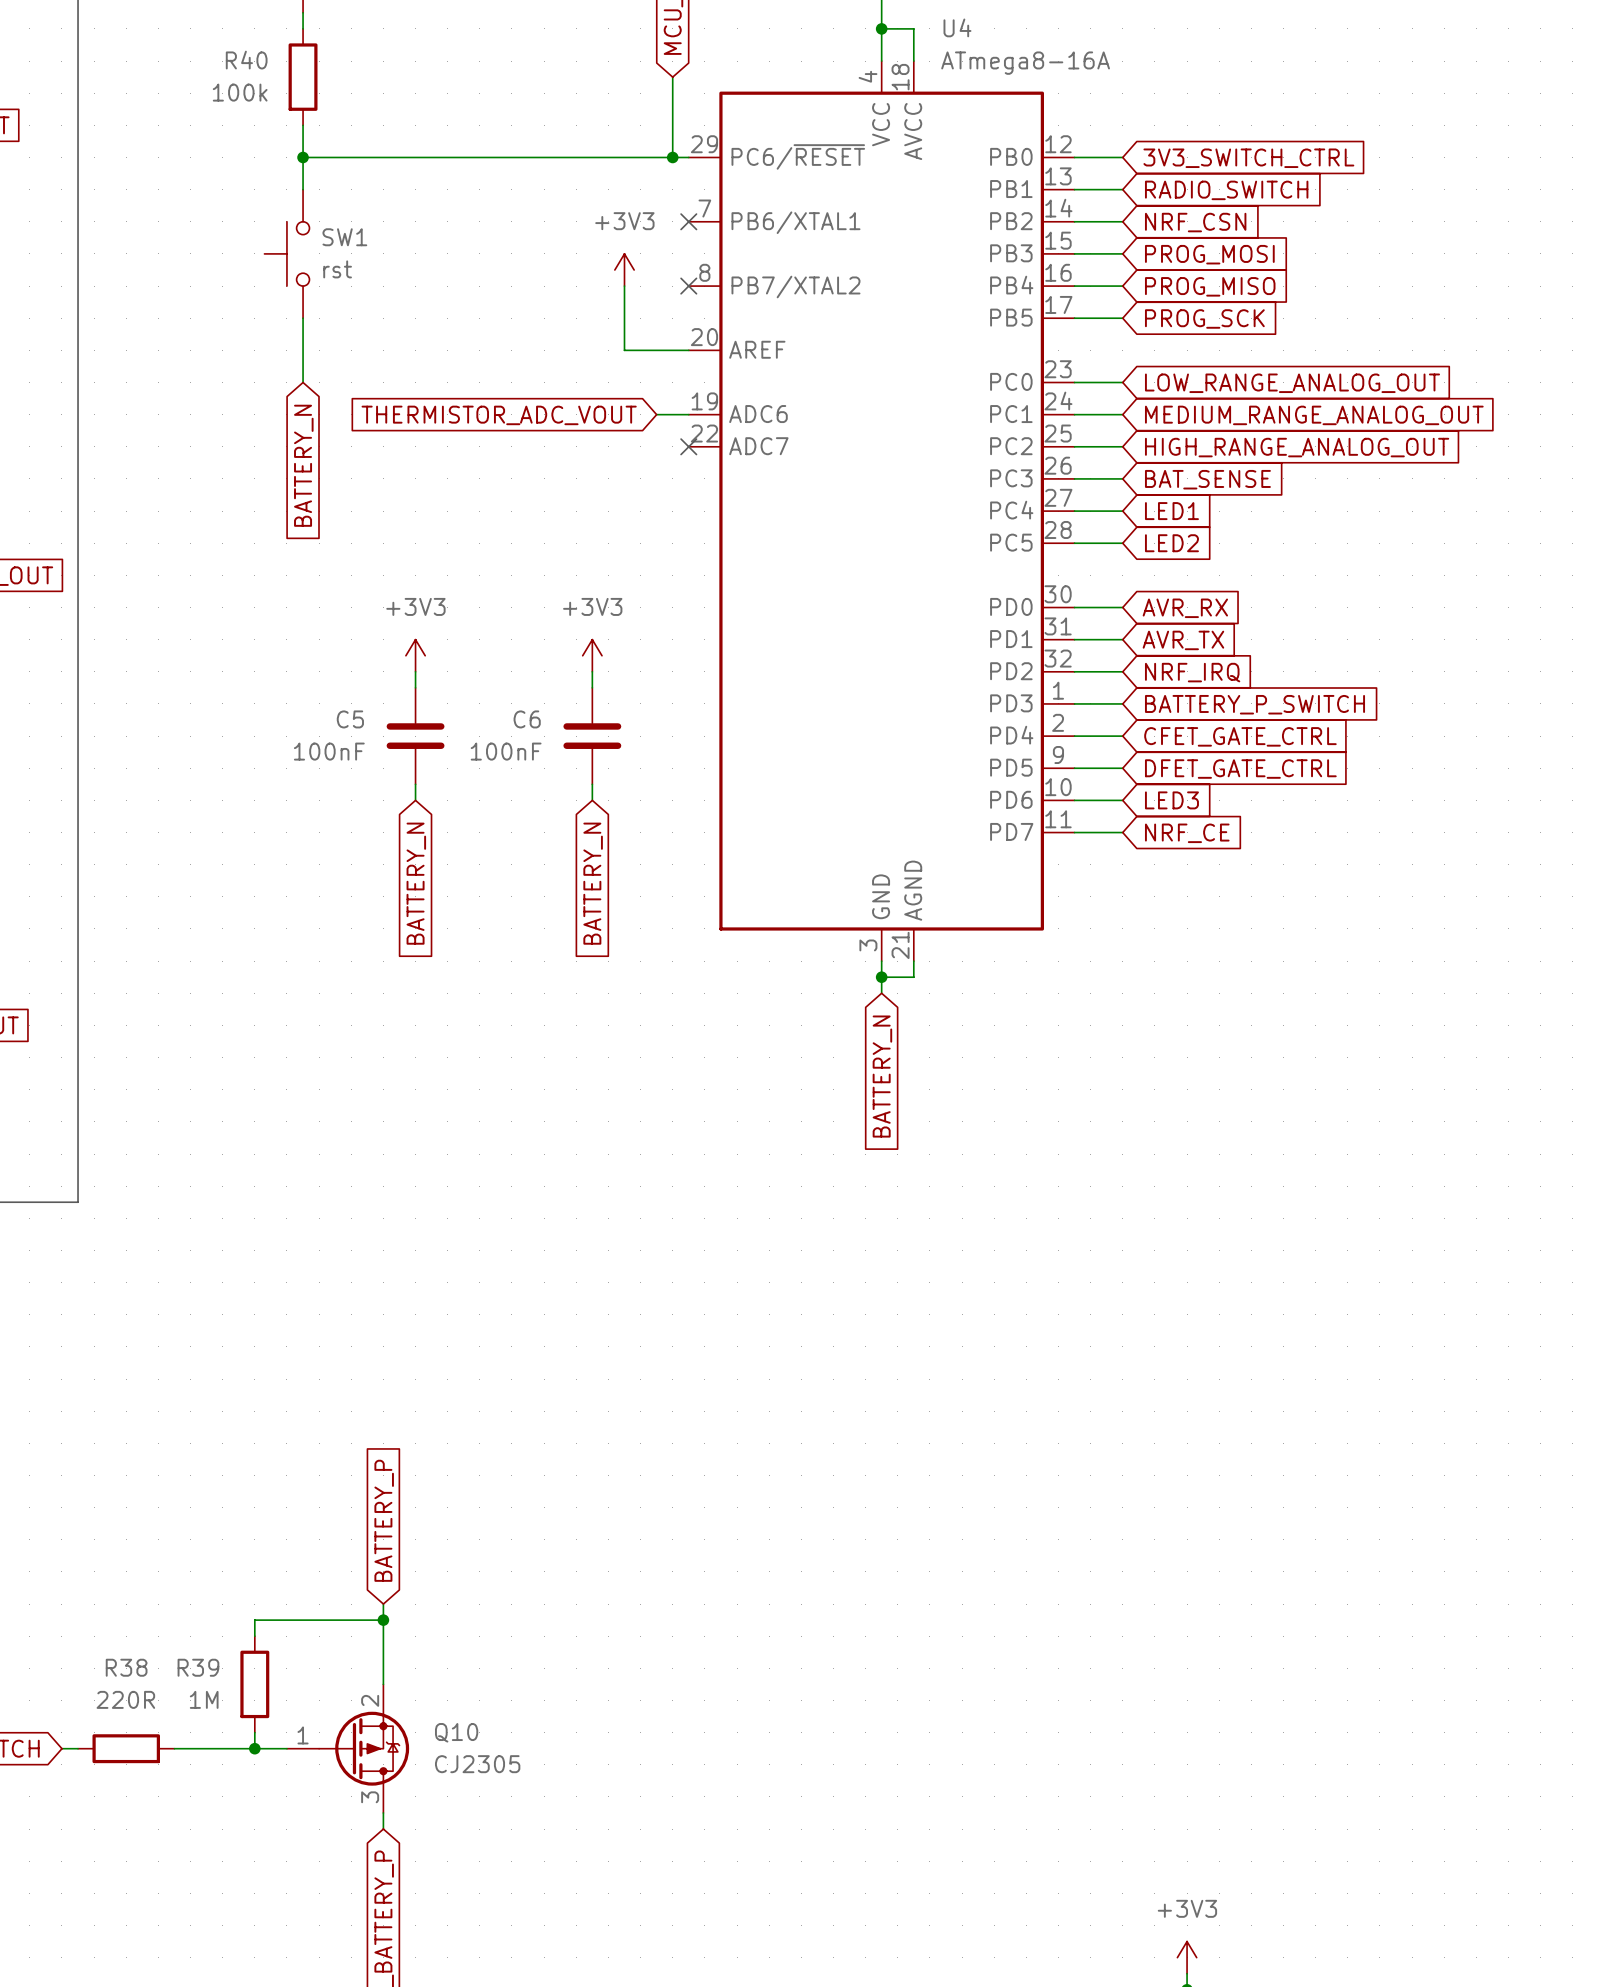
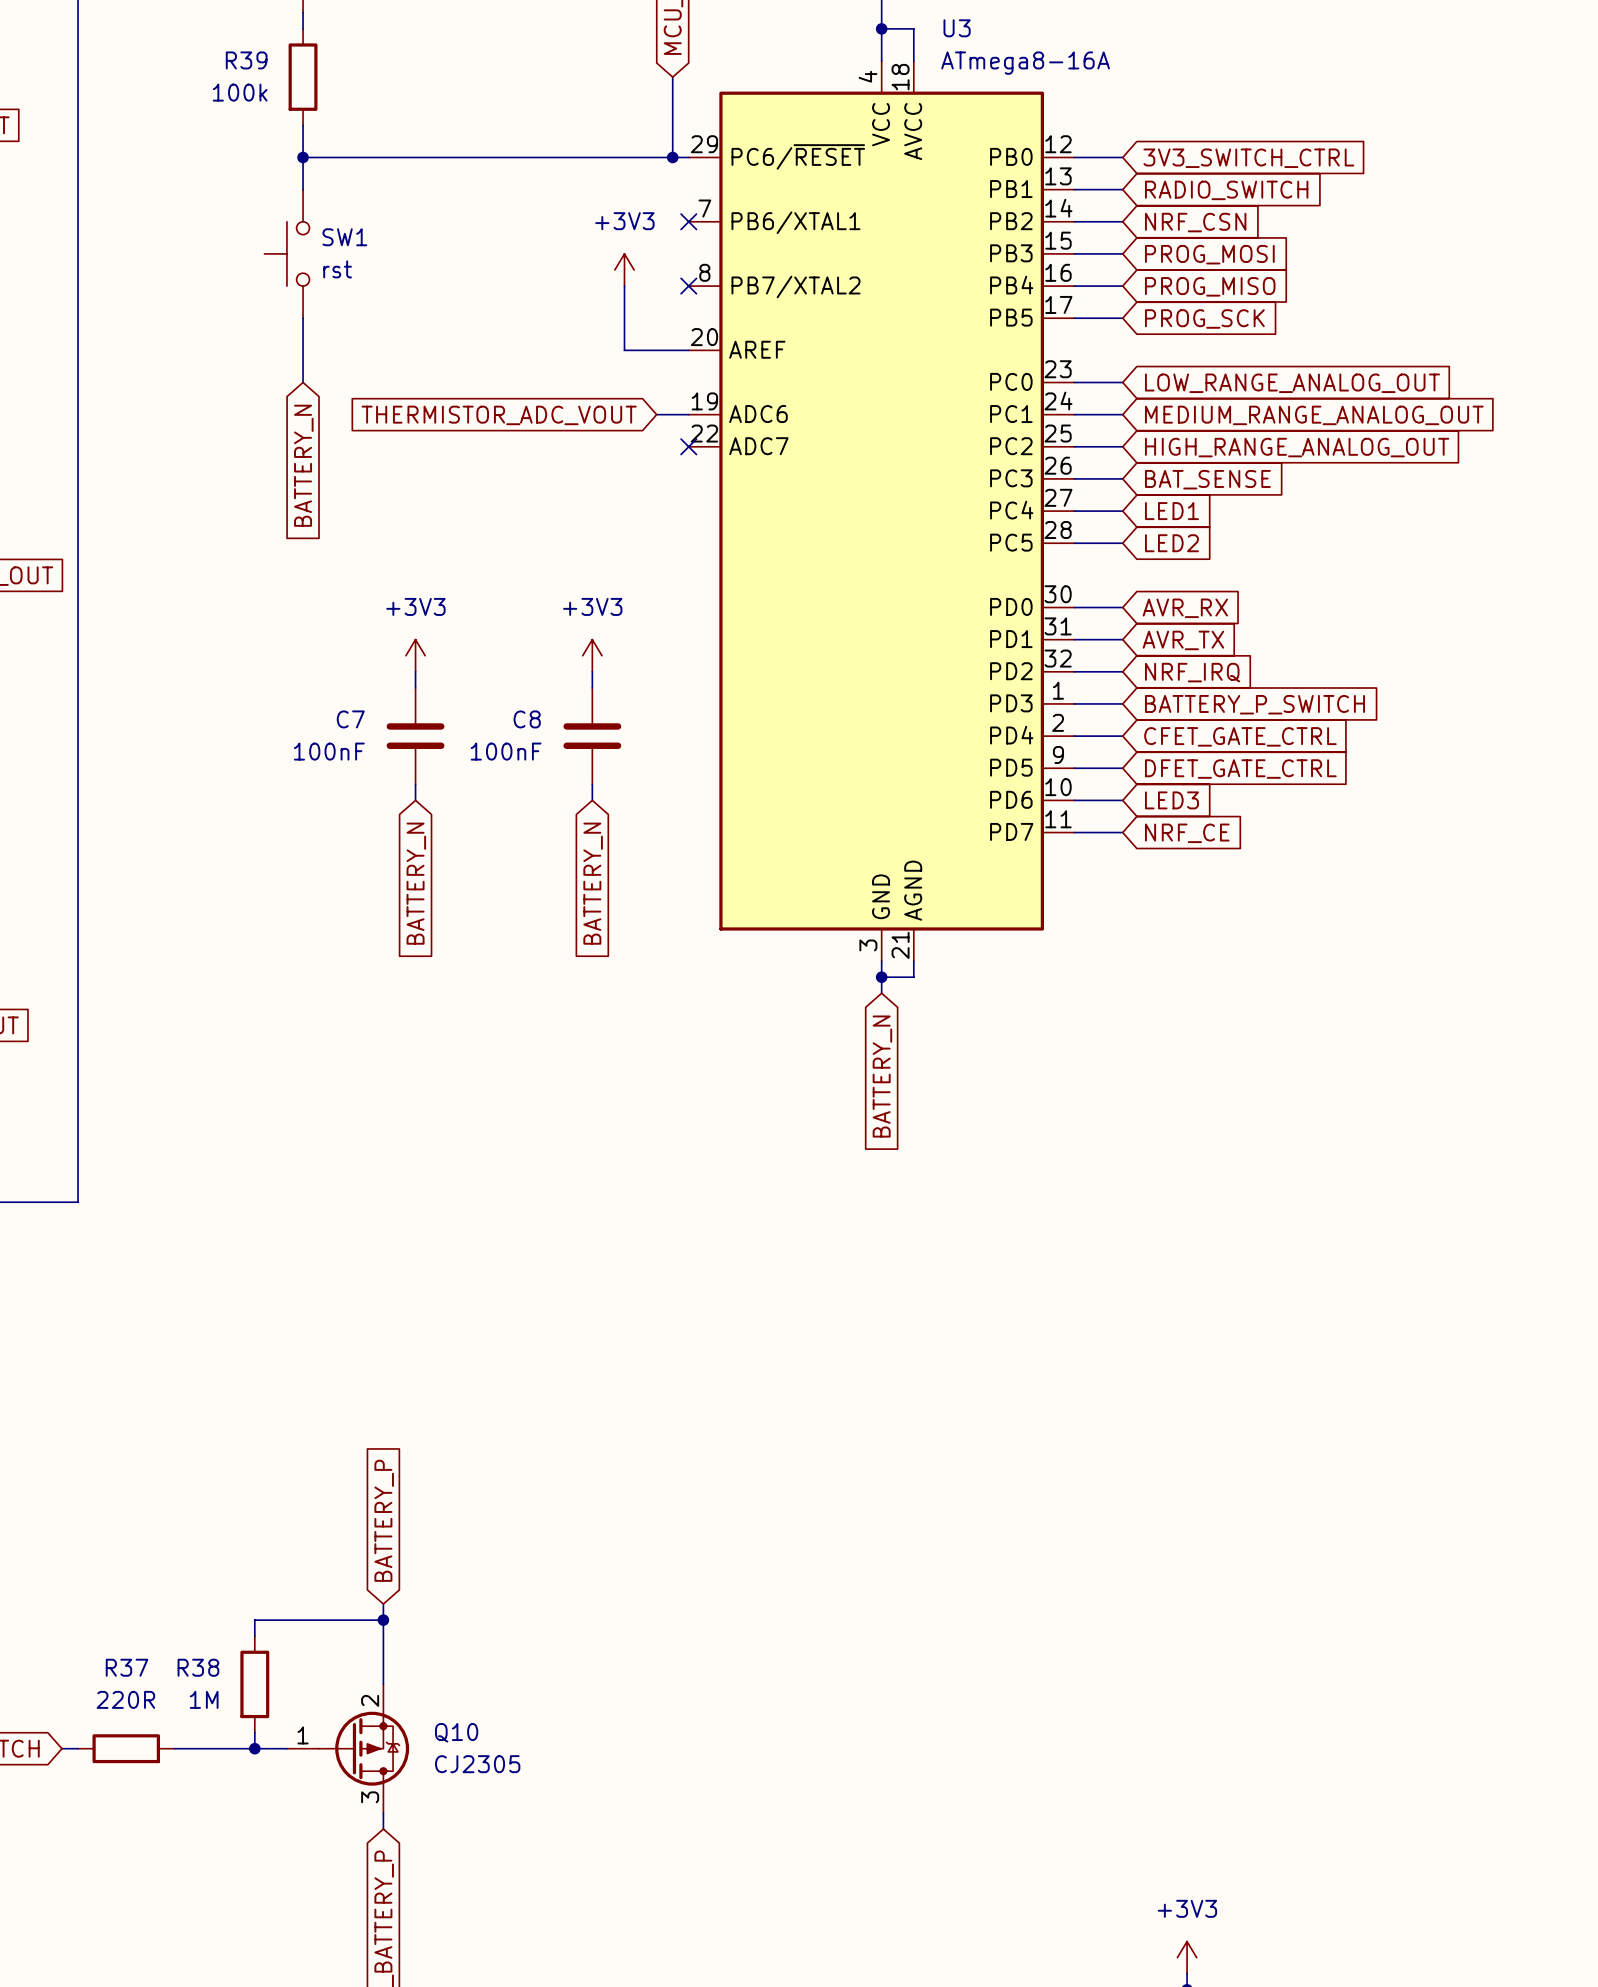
U4 name: U4 (957, 27) -> U3 (957, 28)
R40 name: R40 (246, 60) -> R39 (246, 60)
C5 name: C5 (350, 719) -> C7 (350, 719)
C6 name: C6 (527, 719) -> C8 (527, 719)
R38 name: R38 (126, 1667) -> R37 (127, 1667)
R39 name: R39 (198, 1667) -> R38 (198, 1667)

